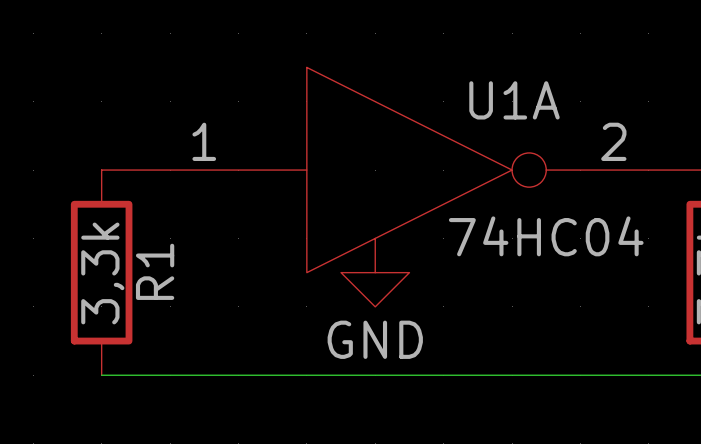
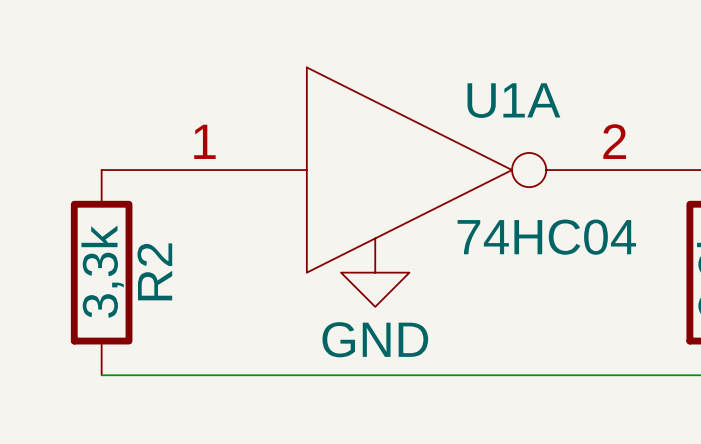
R1 name: R1 (155, 271) -> R2 (154, 271)

